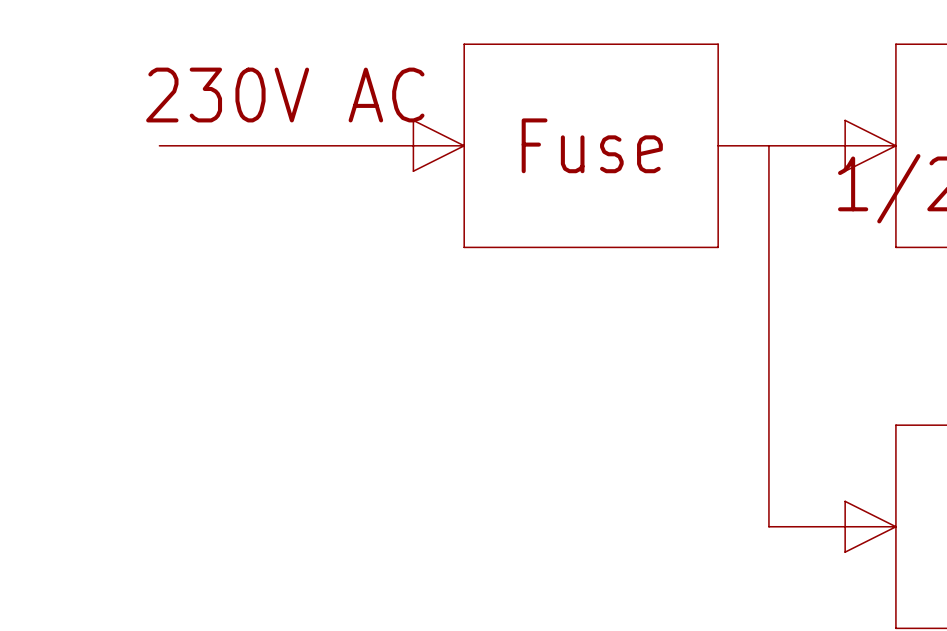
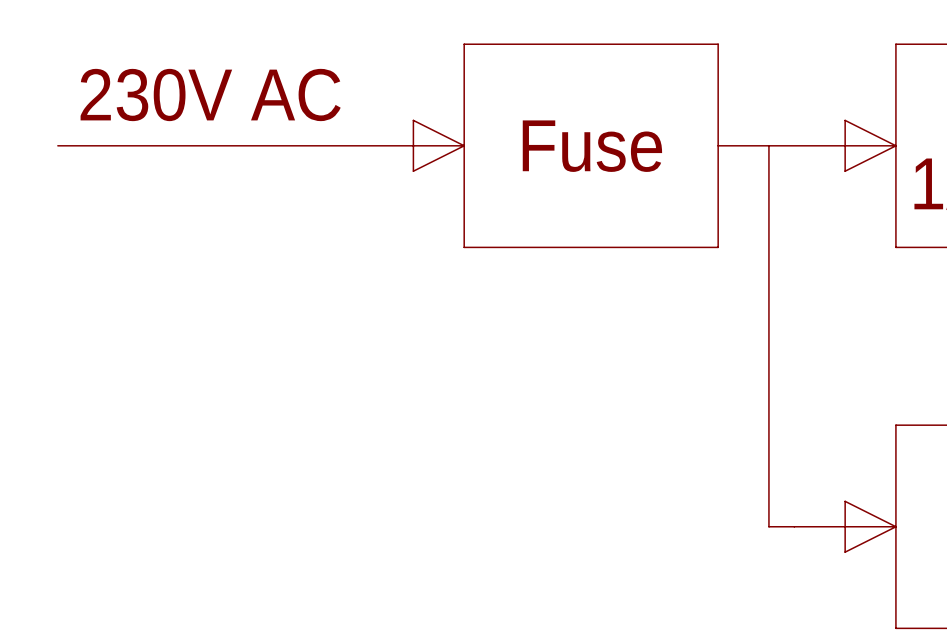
text position: 230V AC (285, 95) -> 230V AC (210, 95)
line: none -> (57, 145) (159, 145)

